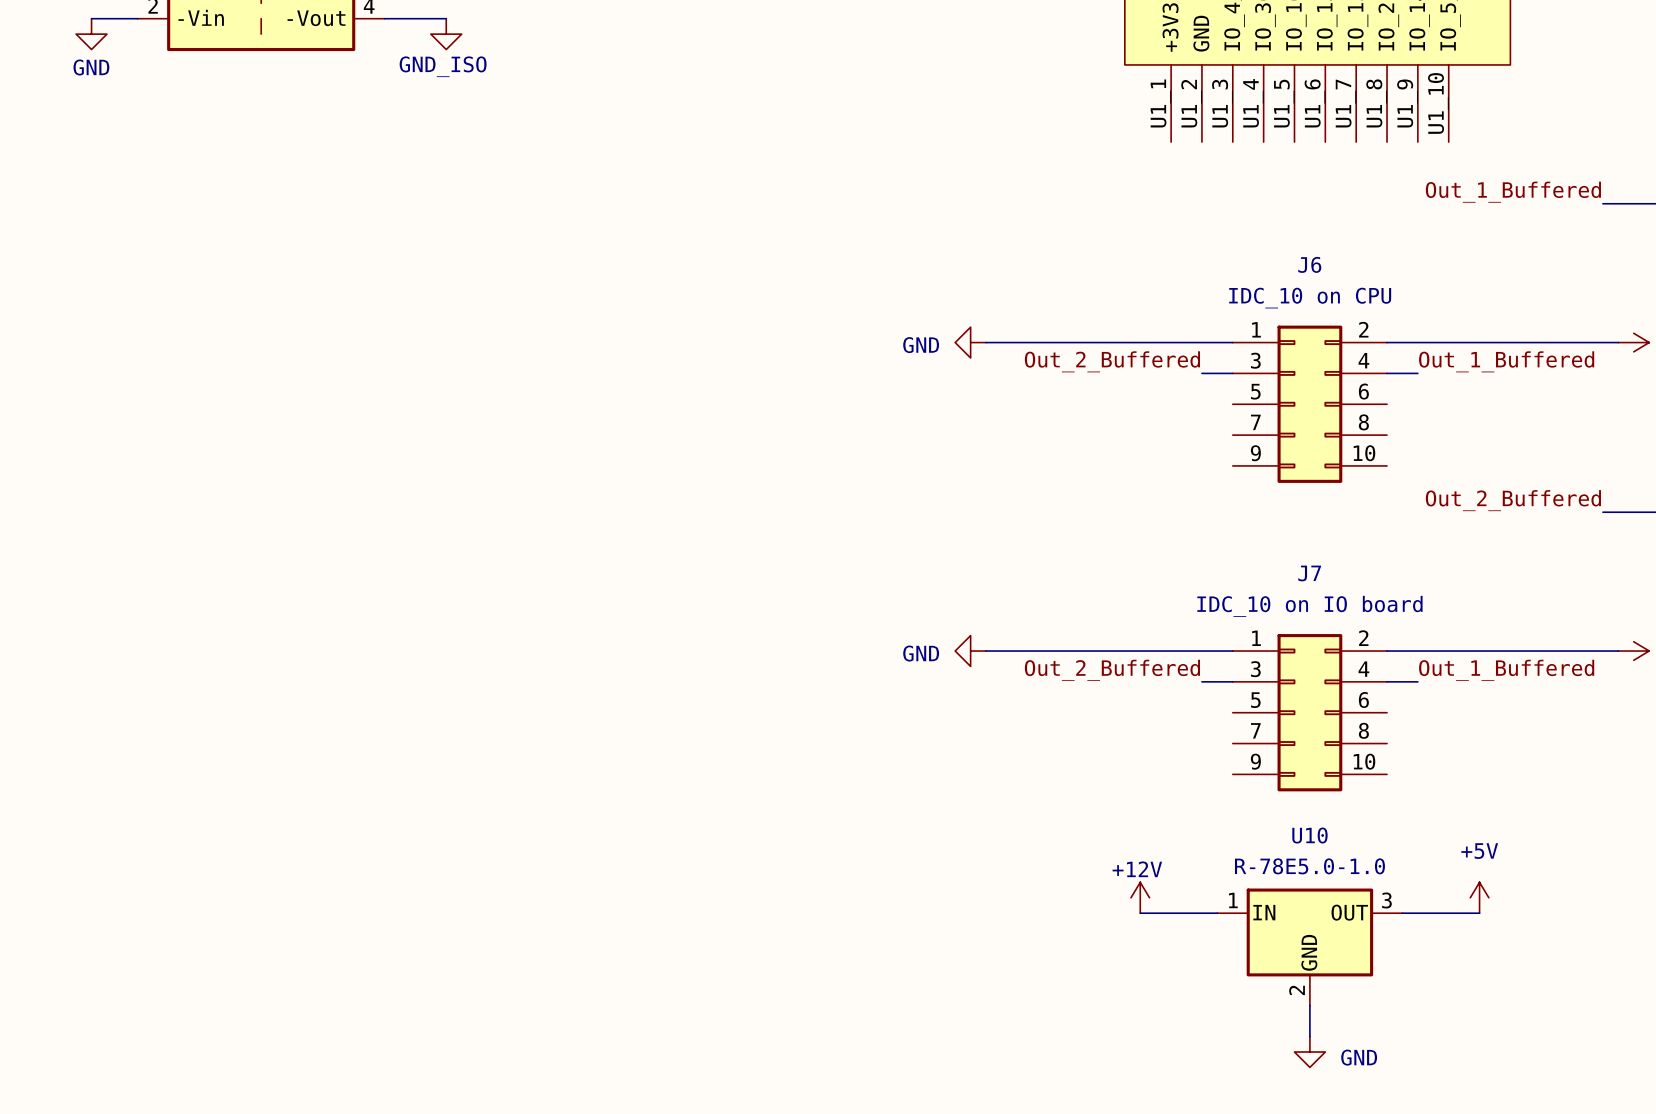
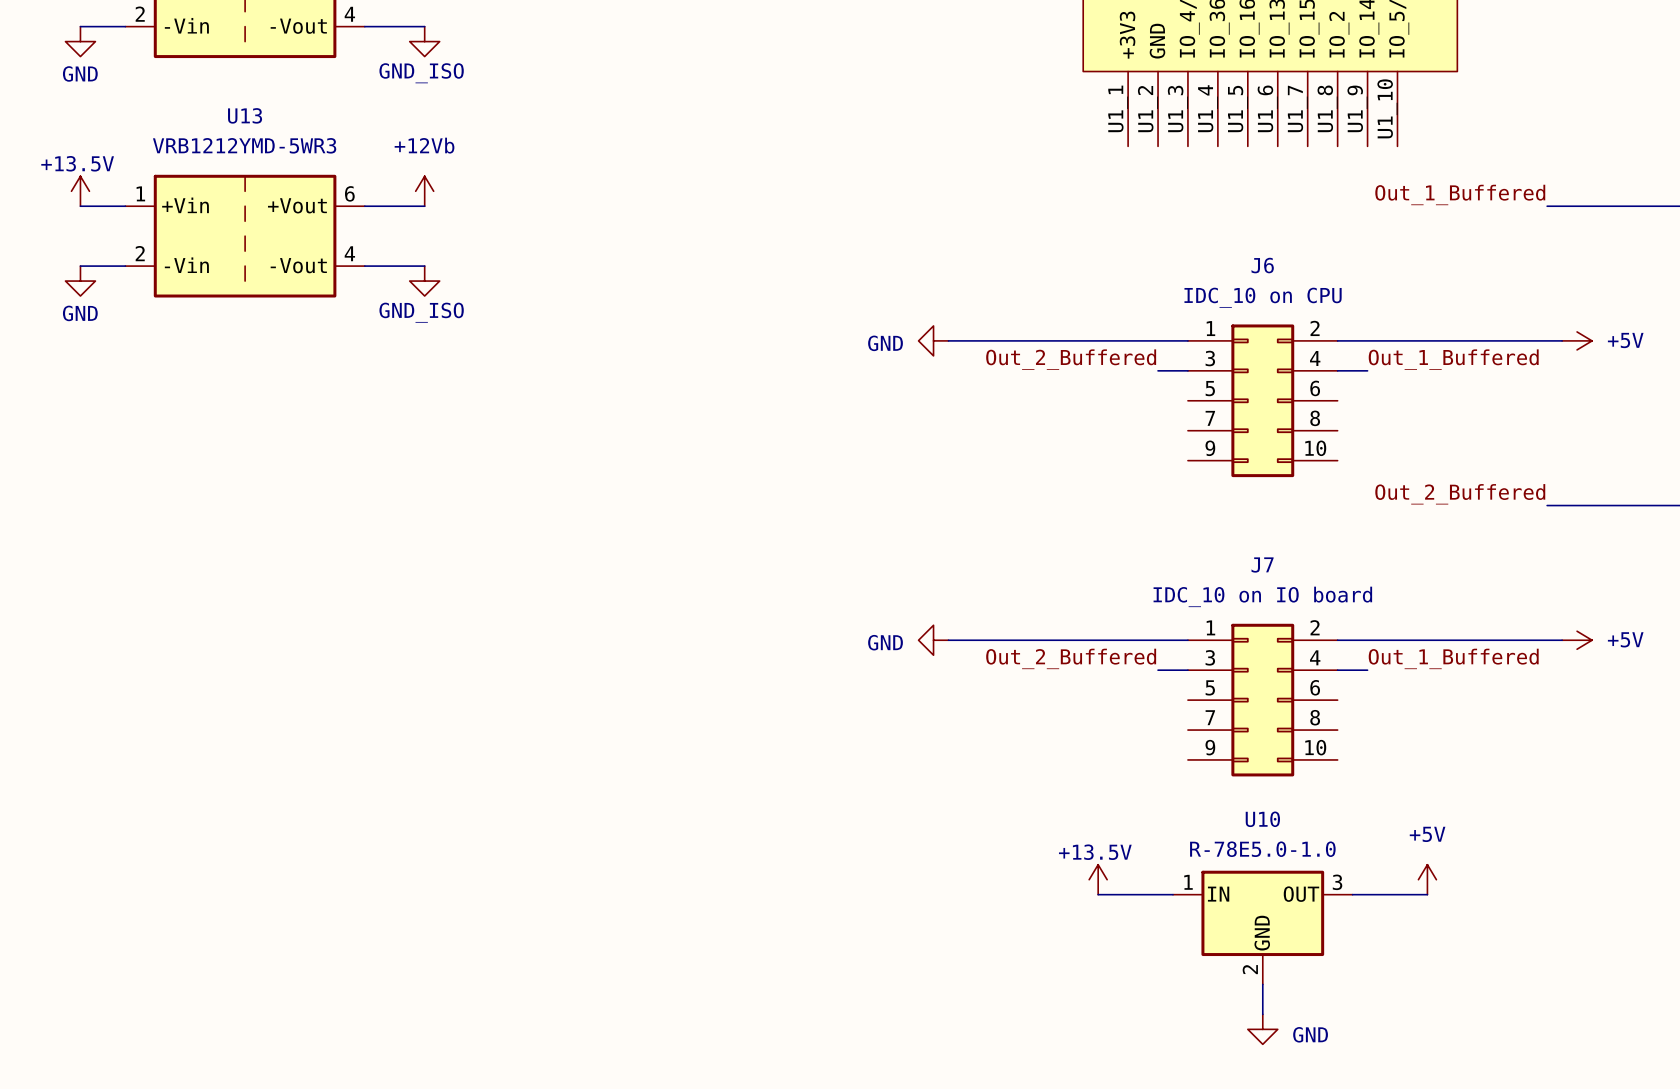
power symbol: none -> +13.5V (80, 191)
power symbol: none -> +12Vb (424, 191)
wire: none -> (80, 206) (125, 206)
wire: none -> (364, 206) (424, 206)
U13: none -> VRB1212YMD-5WR3 (245, 236)
wire: none -> (80, 266) (125, 266)
wire: none -> (364, 266) (424, 266)
power symbol: none -> GND (80, 281)
power symbol: none -> GND_ISO (424, 281)
power symbol: +12V (1140, 897) -> +13.5V (1098, 879)

